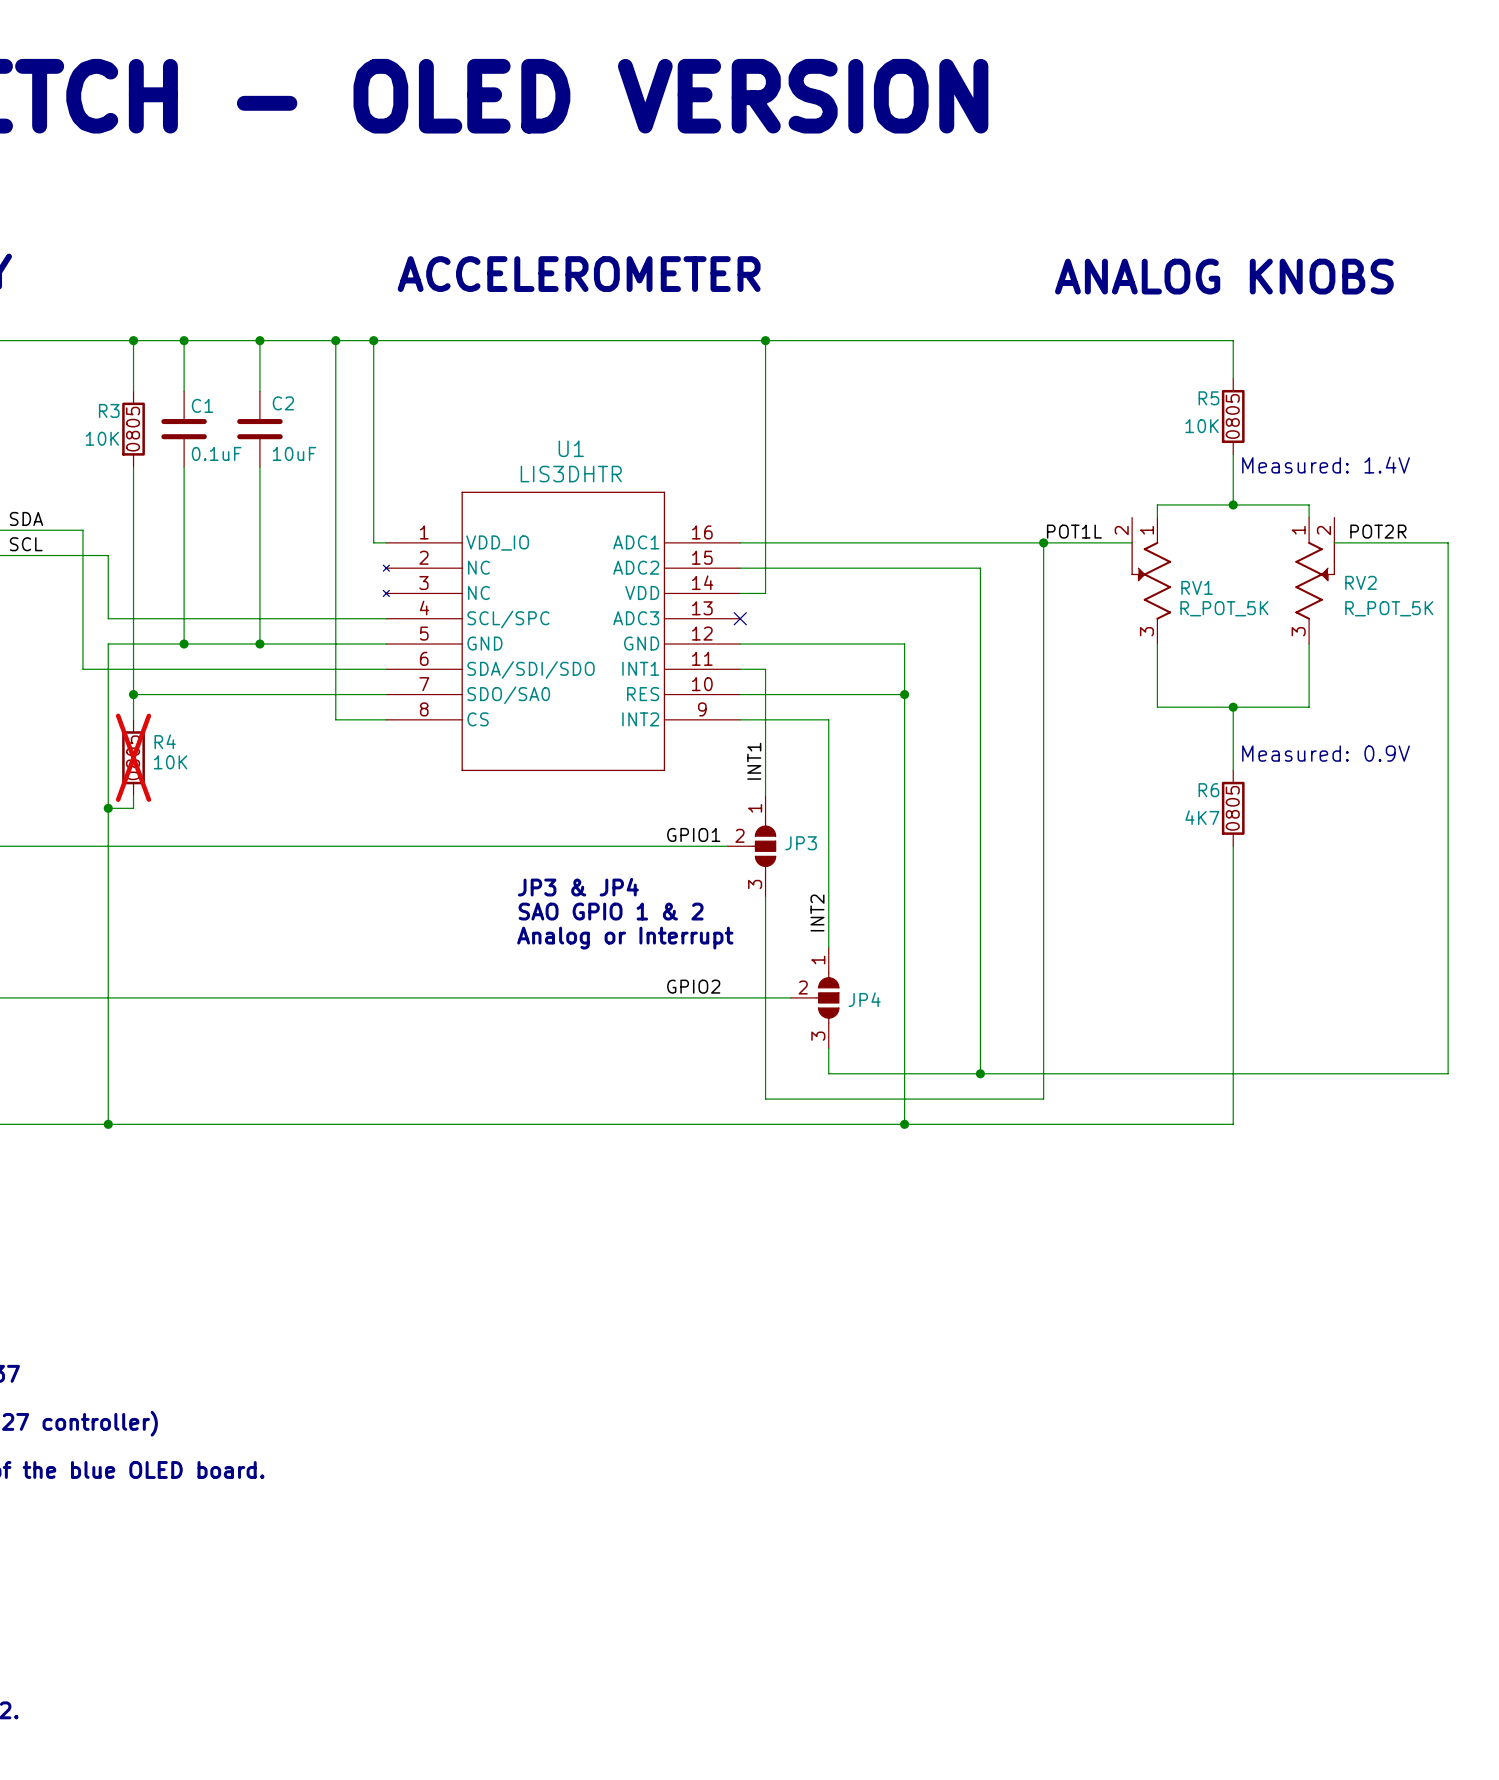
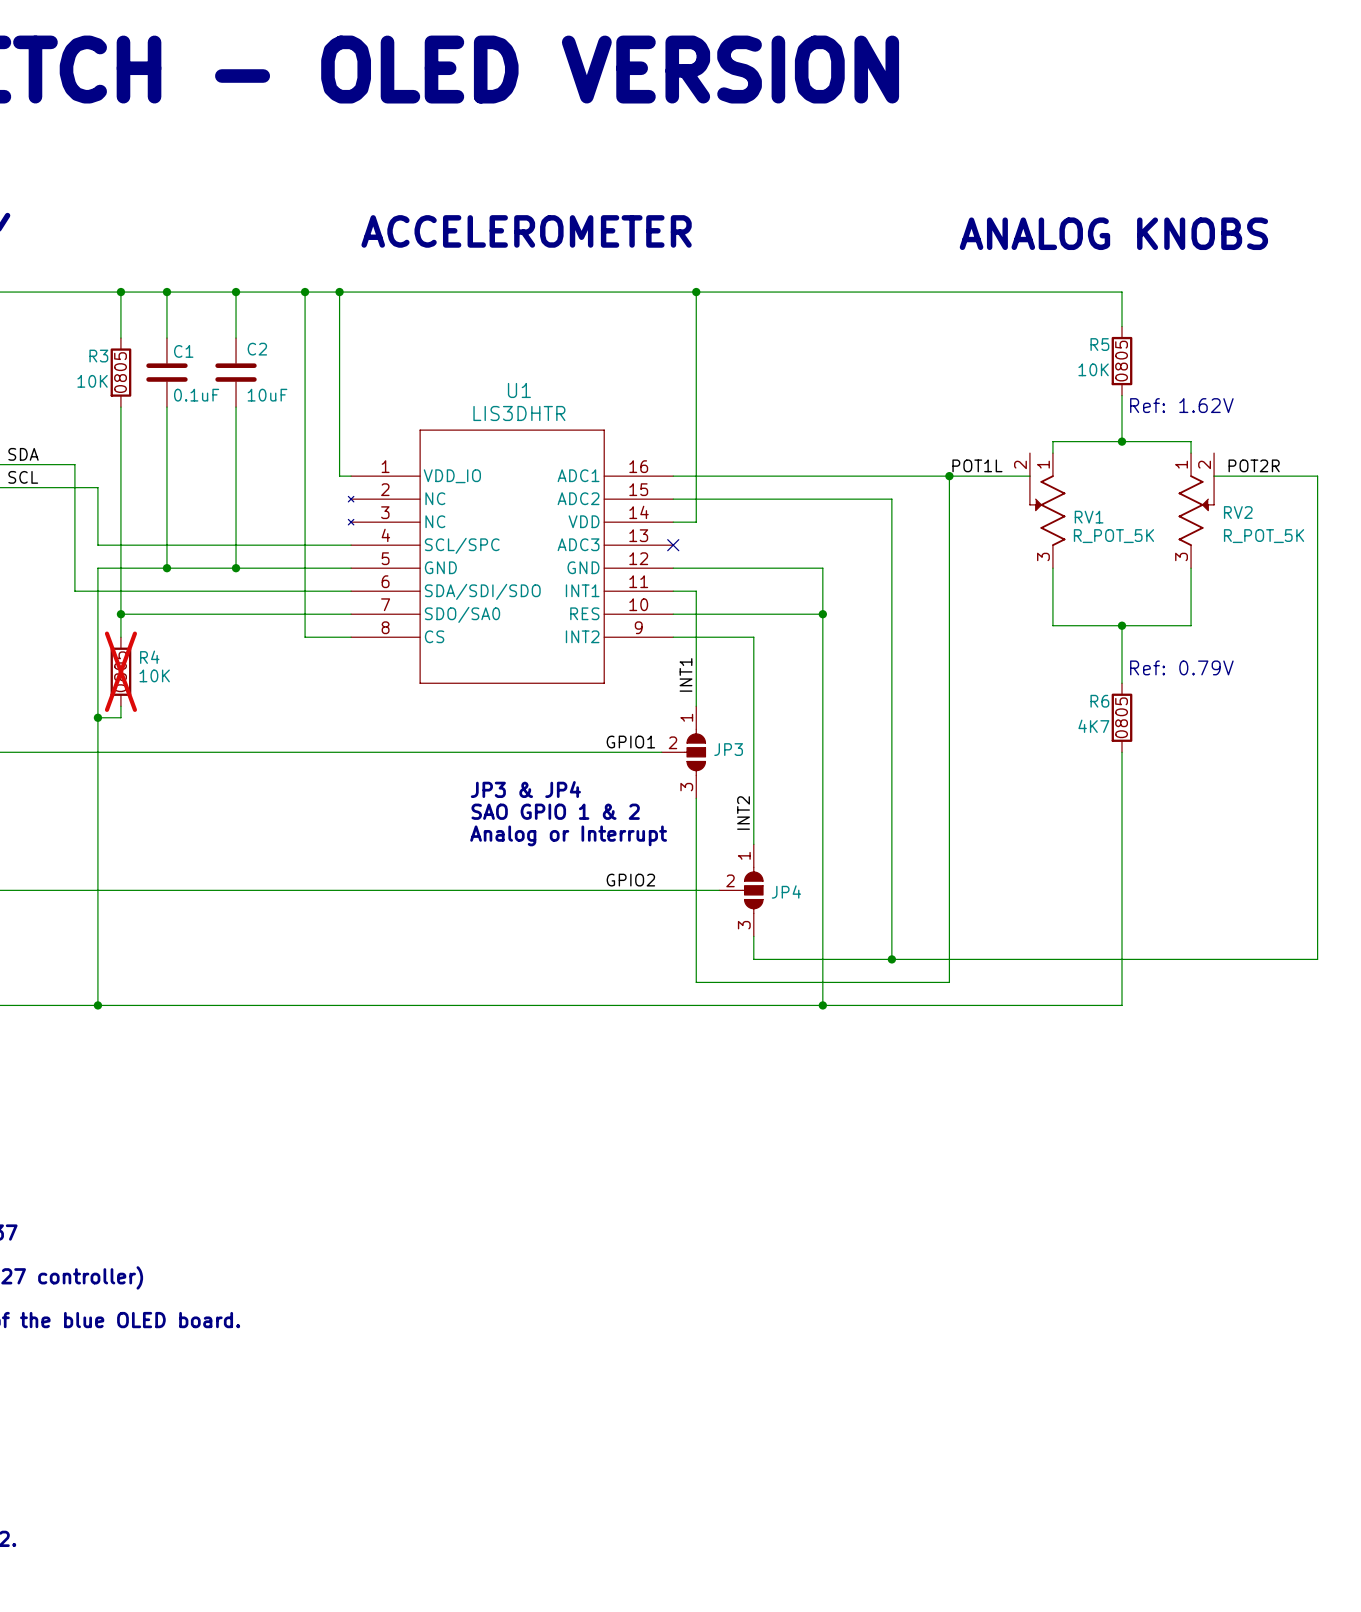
text: Measured: 1.4V (1326, 465) -> Ref: 1.62V (1181, 405)
text: Measured: 0.9V (1326, 753) -> Ref: 0.79V (1181, 667)

